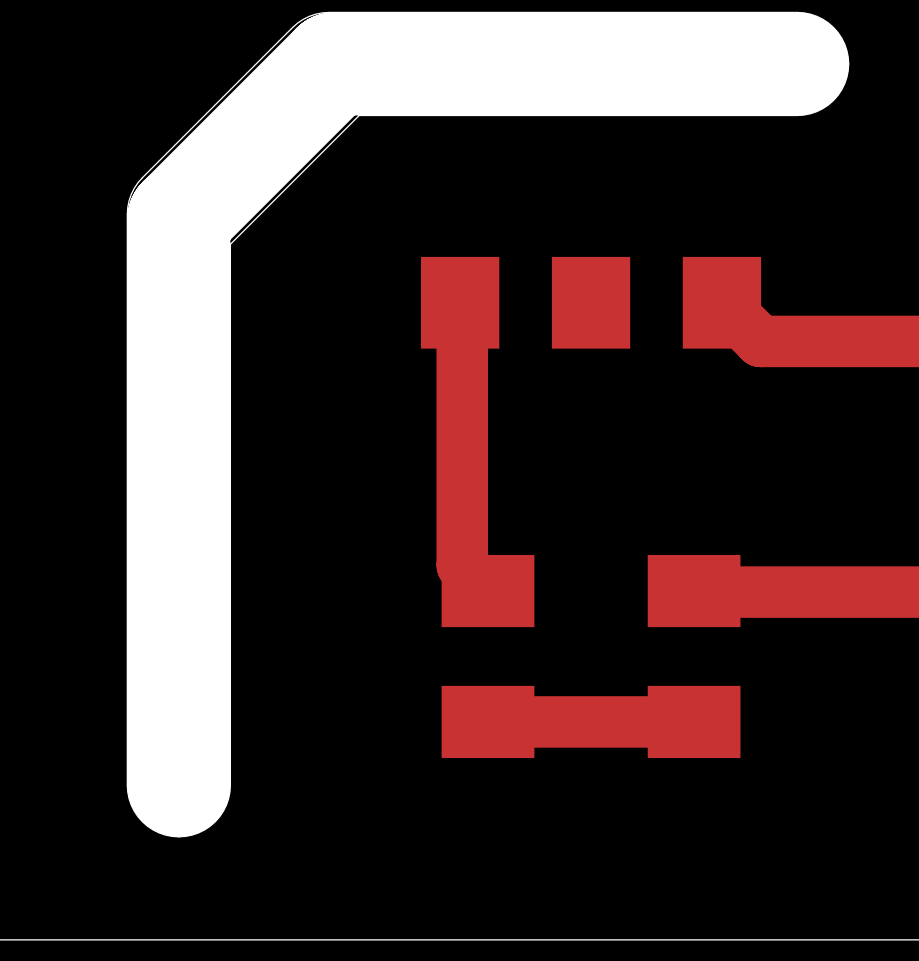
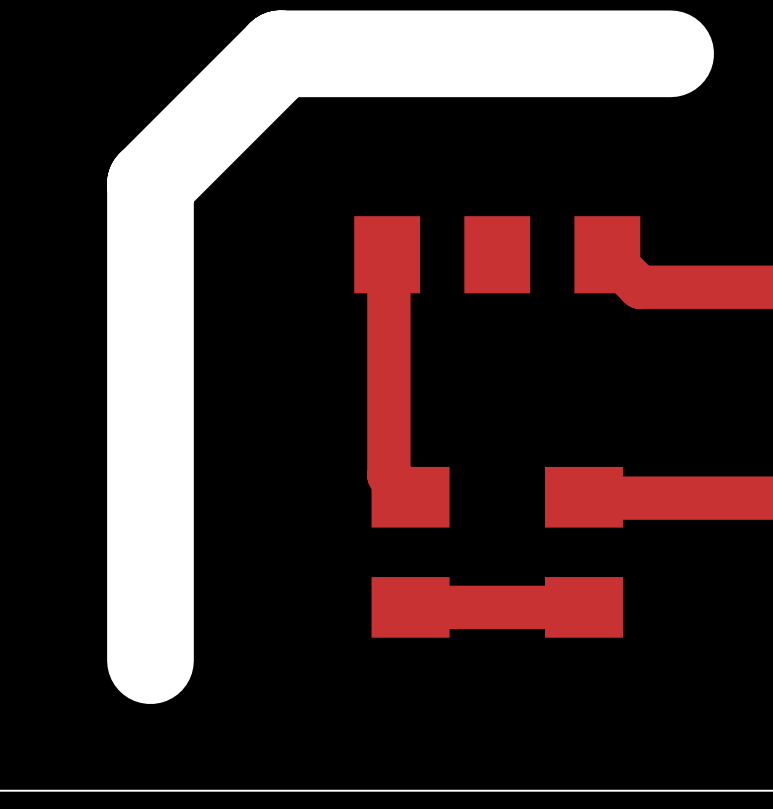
board edge: (797, 12) (329, 12) (315, 14) (303, 19) (292, 27) (137, 182) (131, 194) (127, 214) (127, 785) (131, 805) (137, 816) (147, 826) (159, 832) (172, 836) (185, 836) (198, 832) (210, 826) (219, 816) (226, 805) (229, 792) (230, 244) (359, 115) (797, 115) (816, 111) (833, 100) (844, 83) (848, 63) (846, 50) (838, 32) (828, 23) (816, 16) (797, 12) -> none

